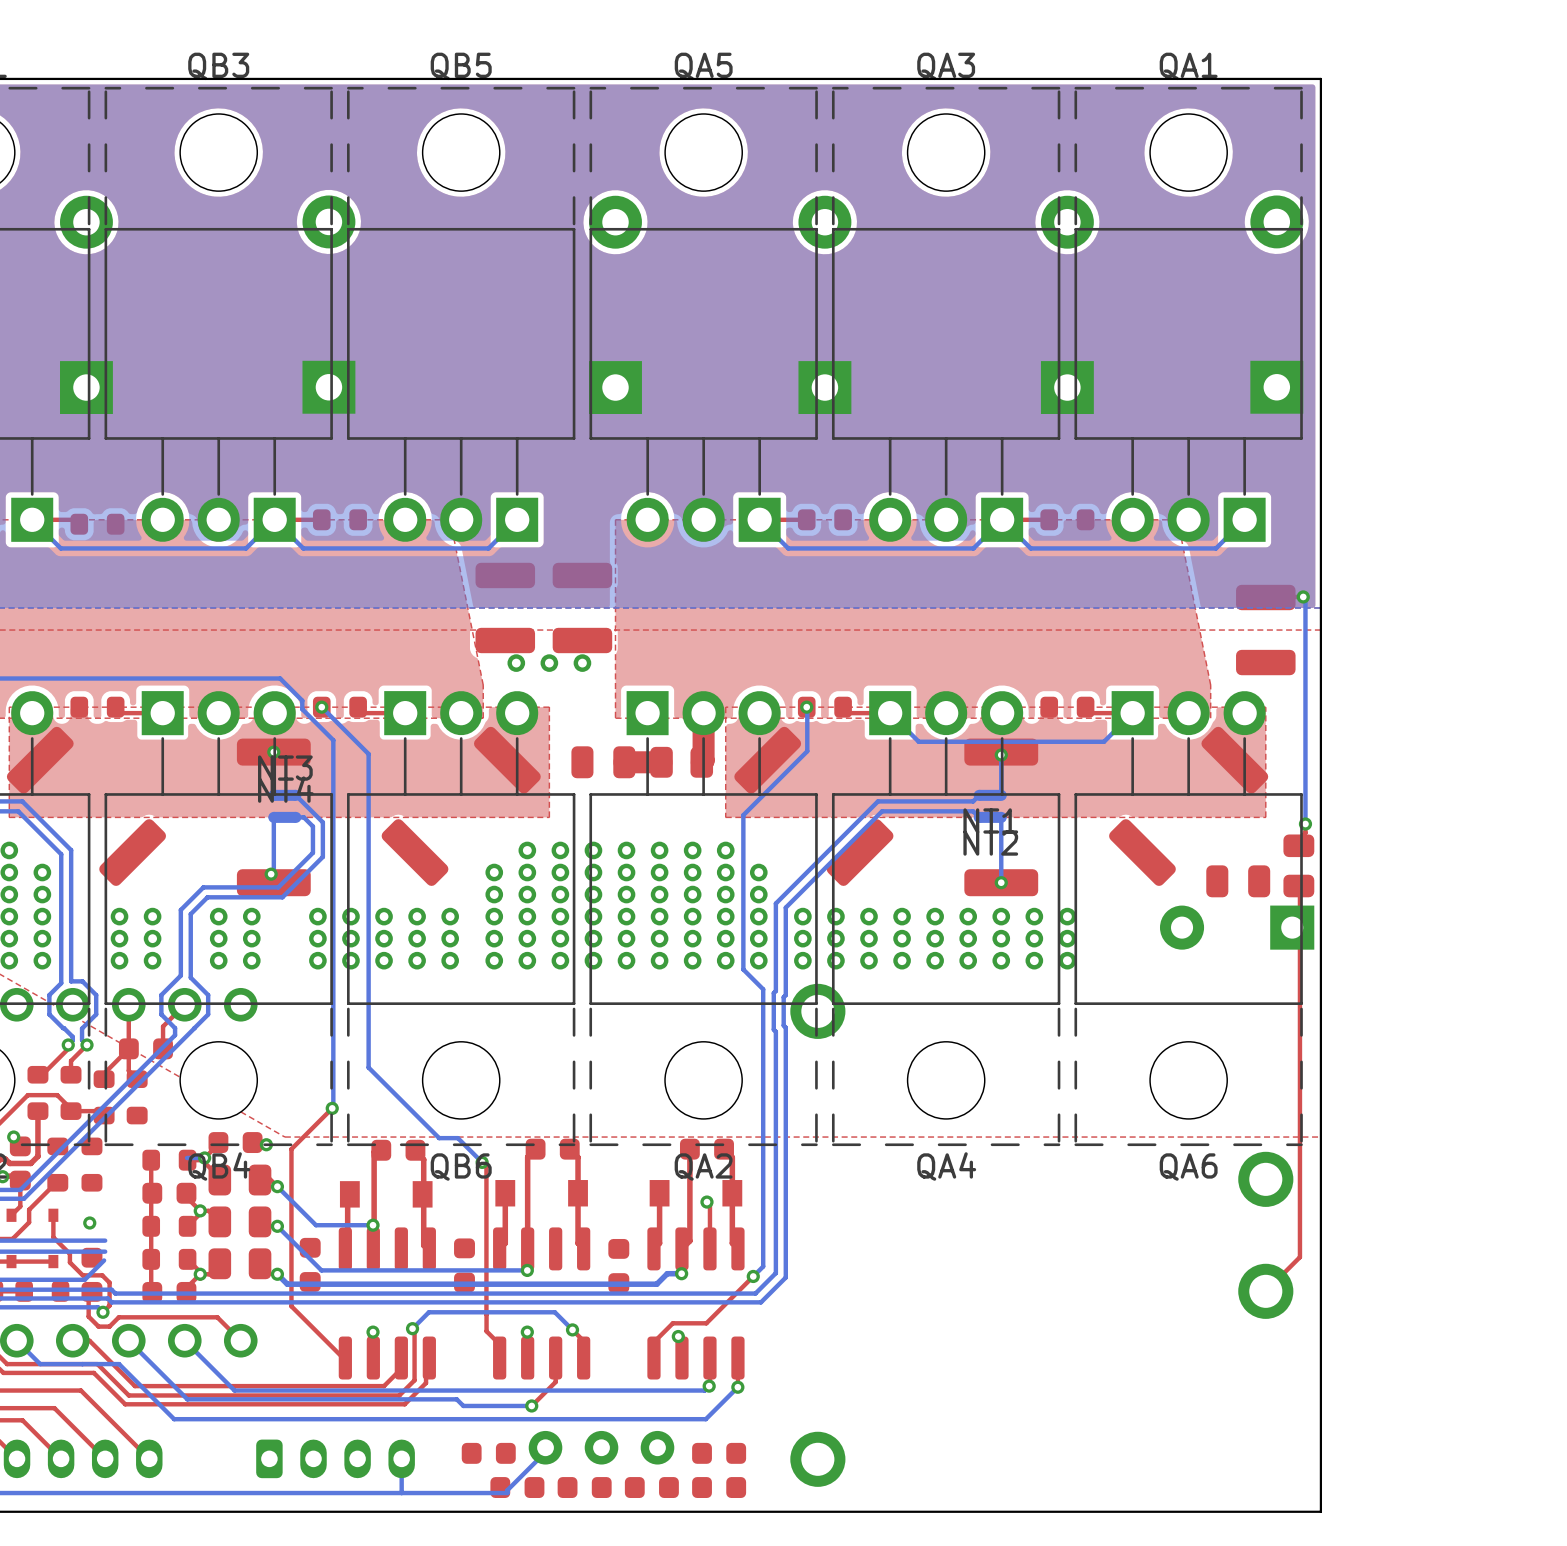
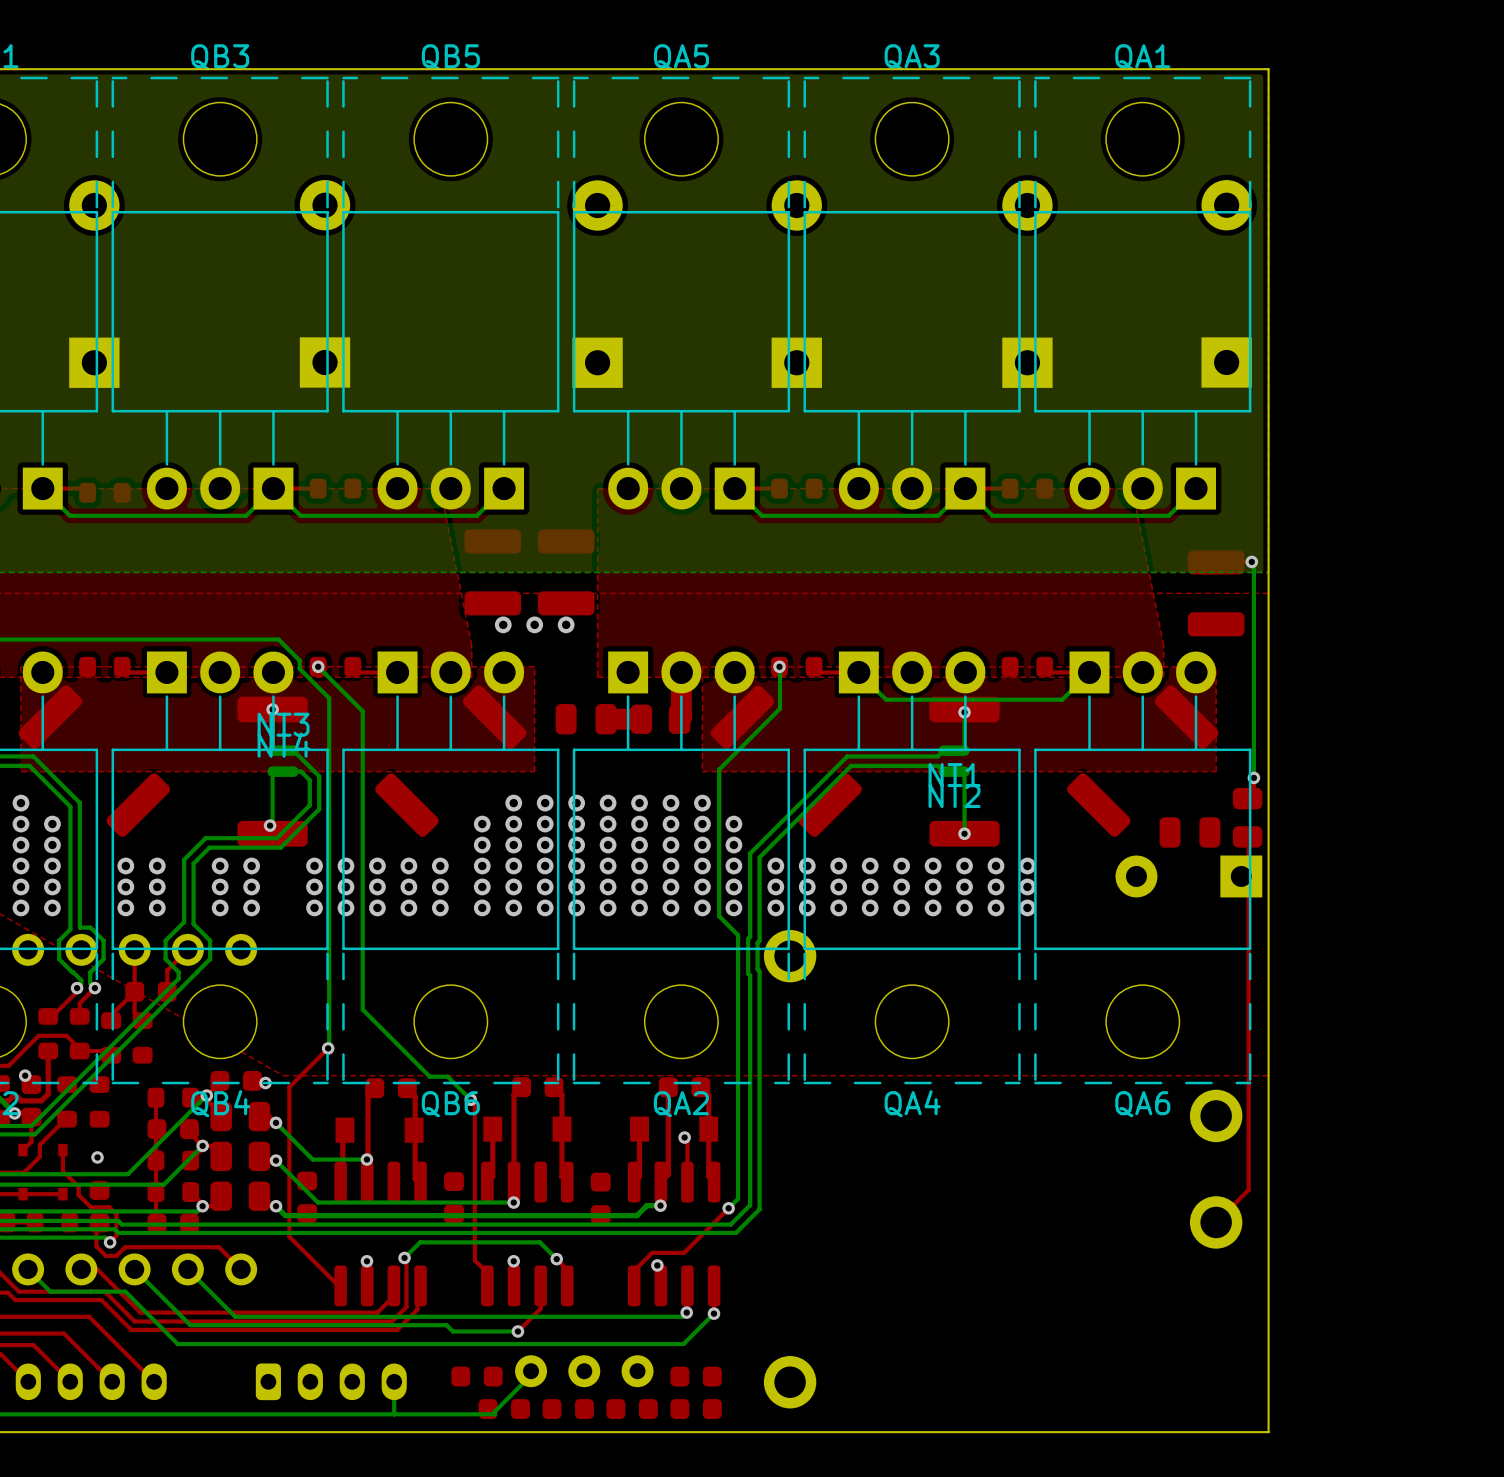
bottom track: (204, 1157) (187, 1157) -> (206, 1095) (127, 1174) (112, 1174)
bottom track: none -> (202, 1145) (163, 1184) (112, 1184)
bottom track: (104, 1260) (84, 1279) -> (202, 1206) (197, 1211) (92, 1211)

